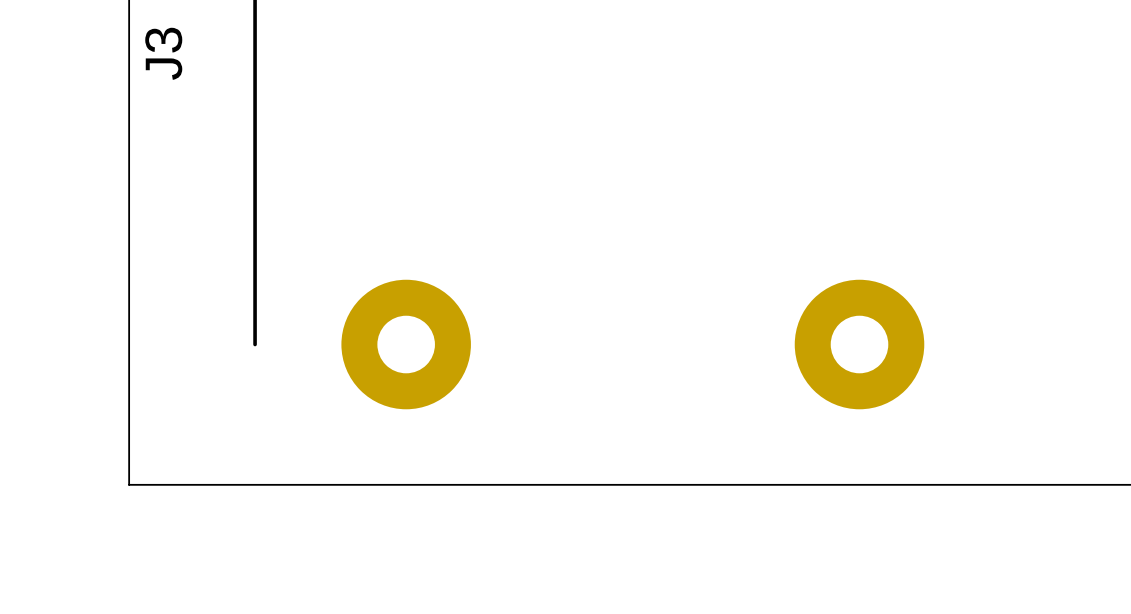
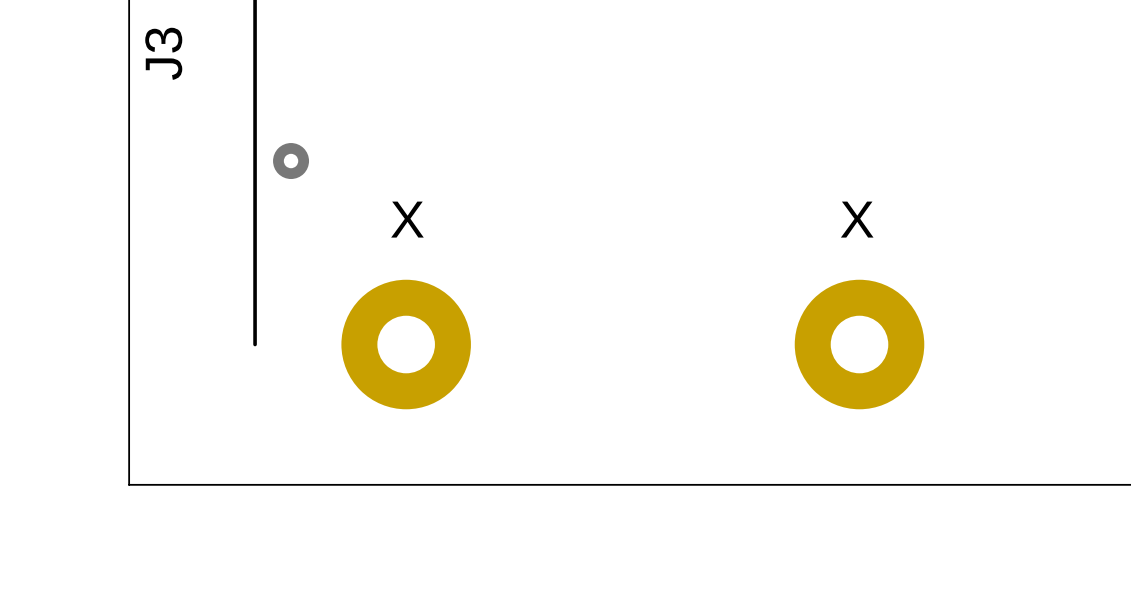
via: none -> (291, 161)
text: none -> X (407, 219)
text: none -> X (857, 219)

